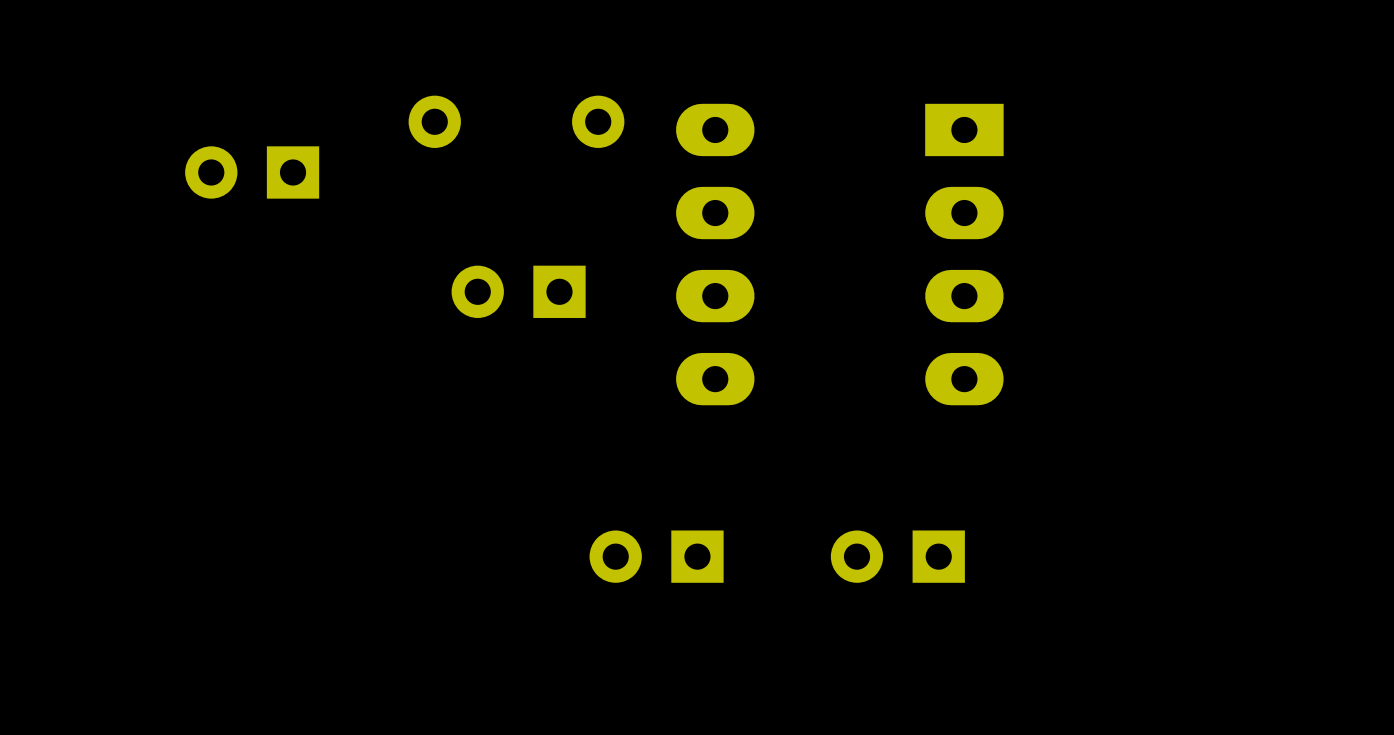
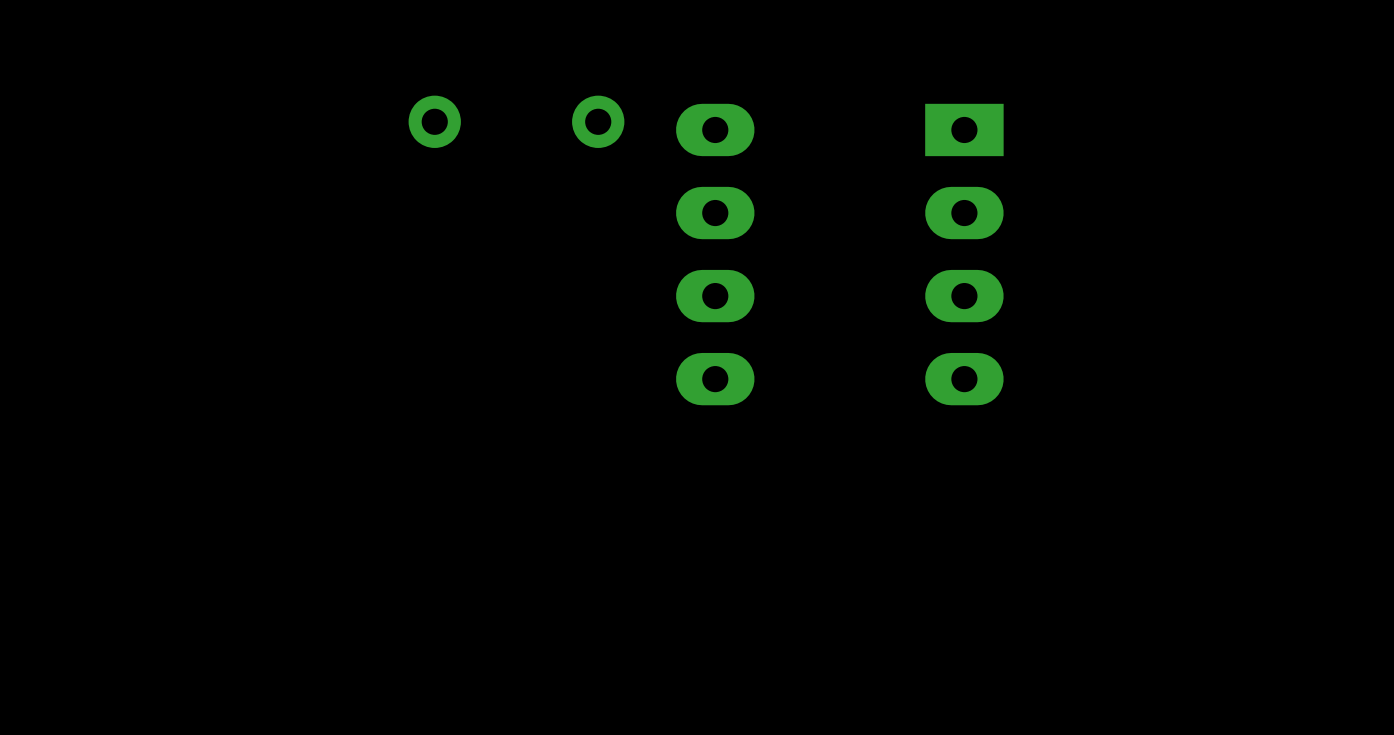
part: (252, 172) -> none
part: (518, 291) -> none
part: (656, 556) -> none
part: (897, 556) -> none

